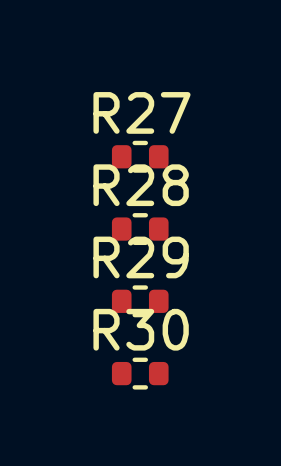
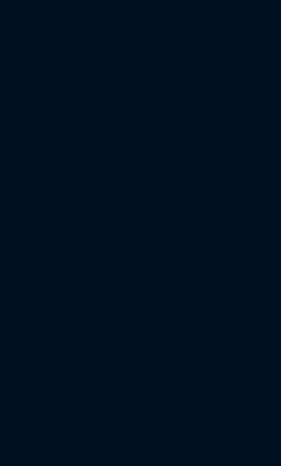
R27: (140, 156) -> none
R28: (140, 229) -> none
R29: (140, 301) -> none
R30: (140, 373) -> none

